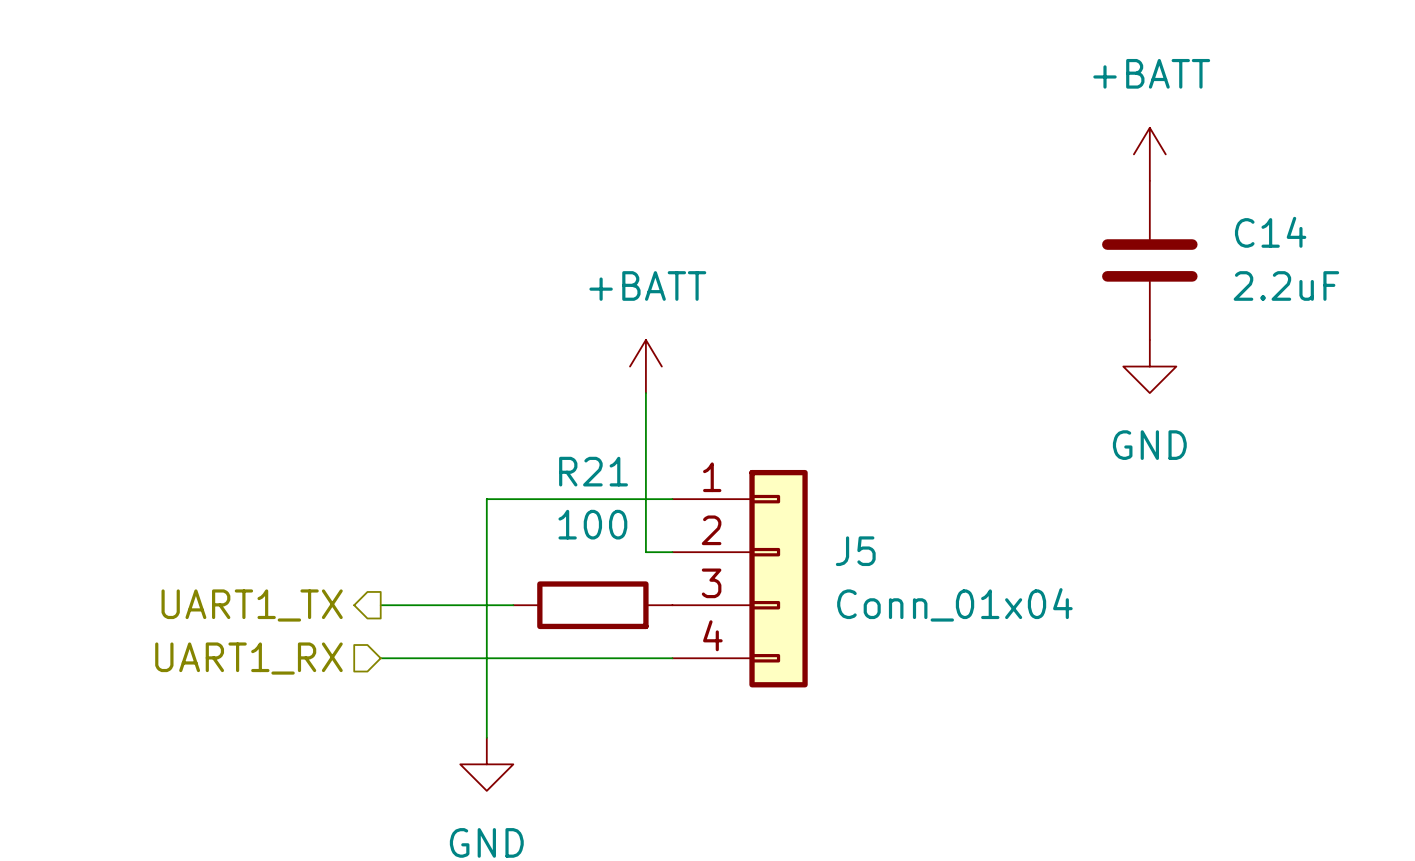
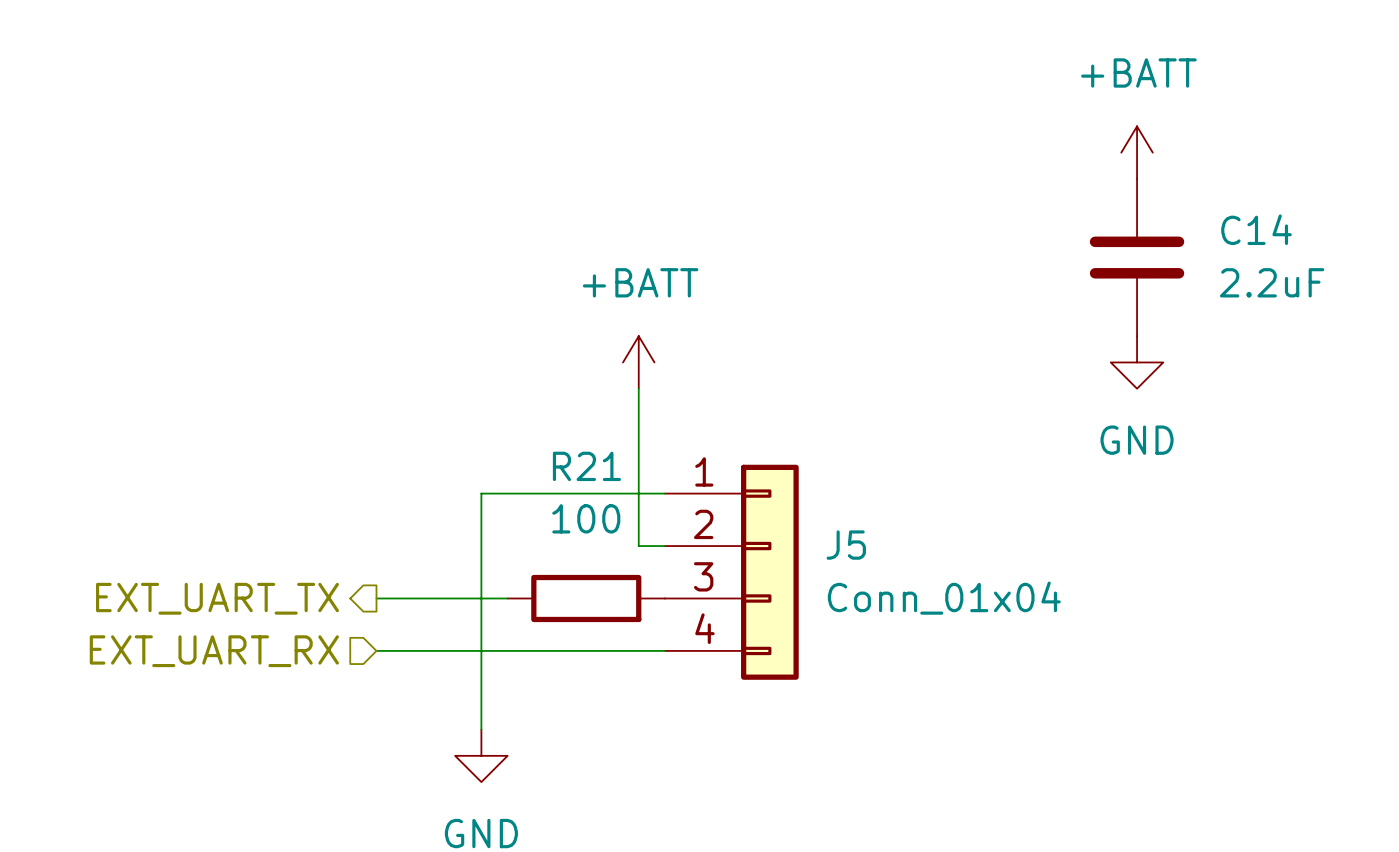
hierarchical label: UART1_TX (252, 605) -> EXT_UART_TX (217, 598)
hierarchical label: UART1_RX (248, 658) -> EXT_UART_RX (214, 651)

